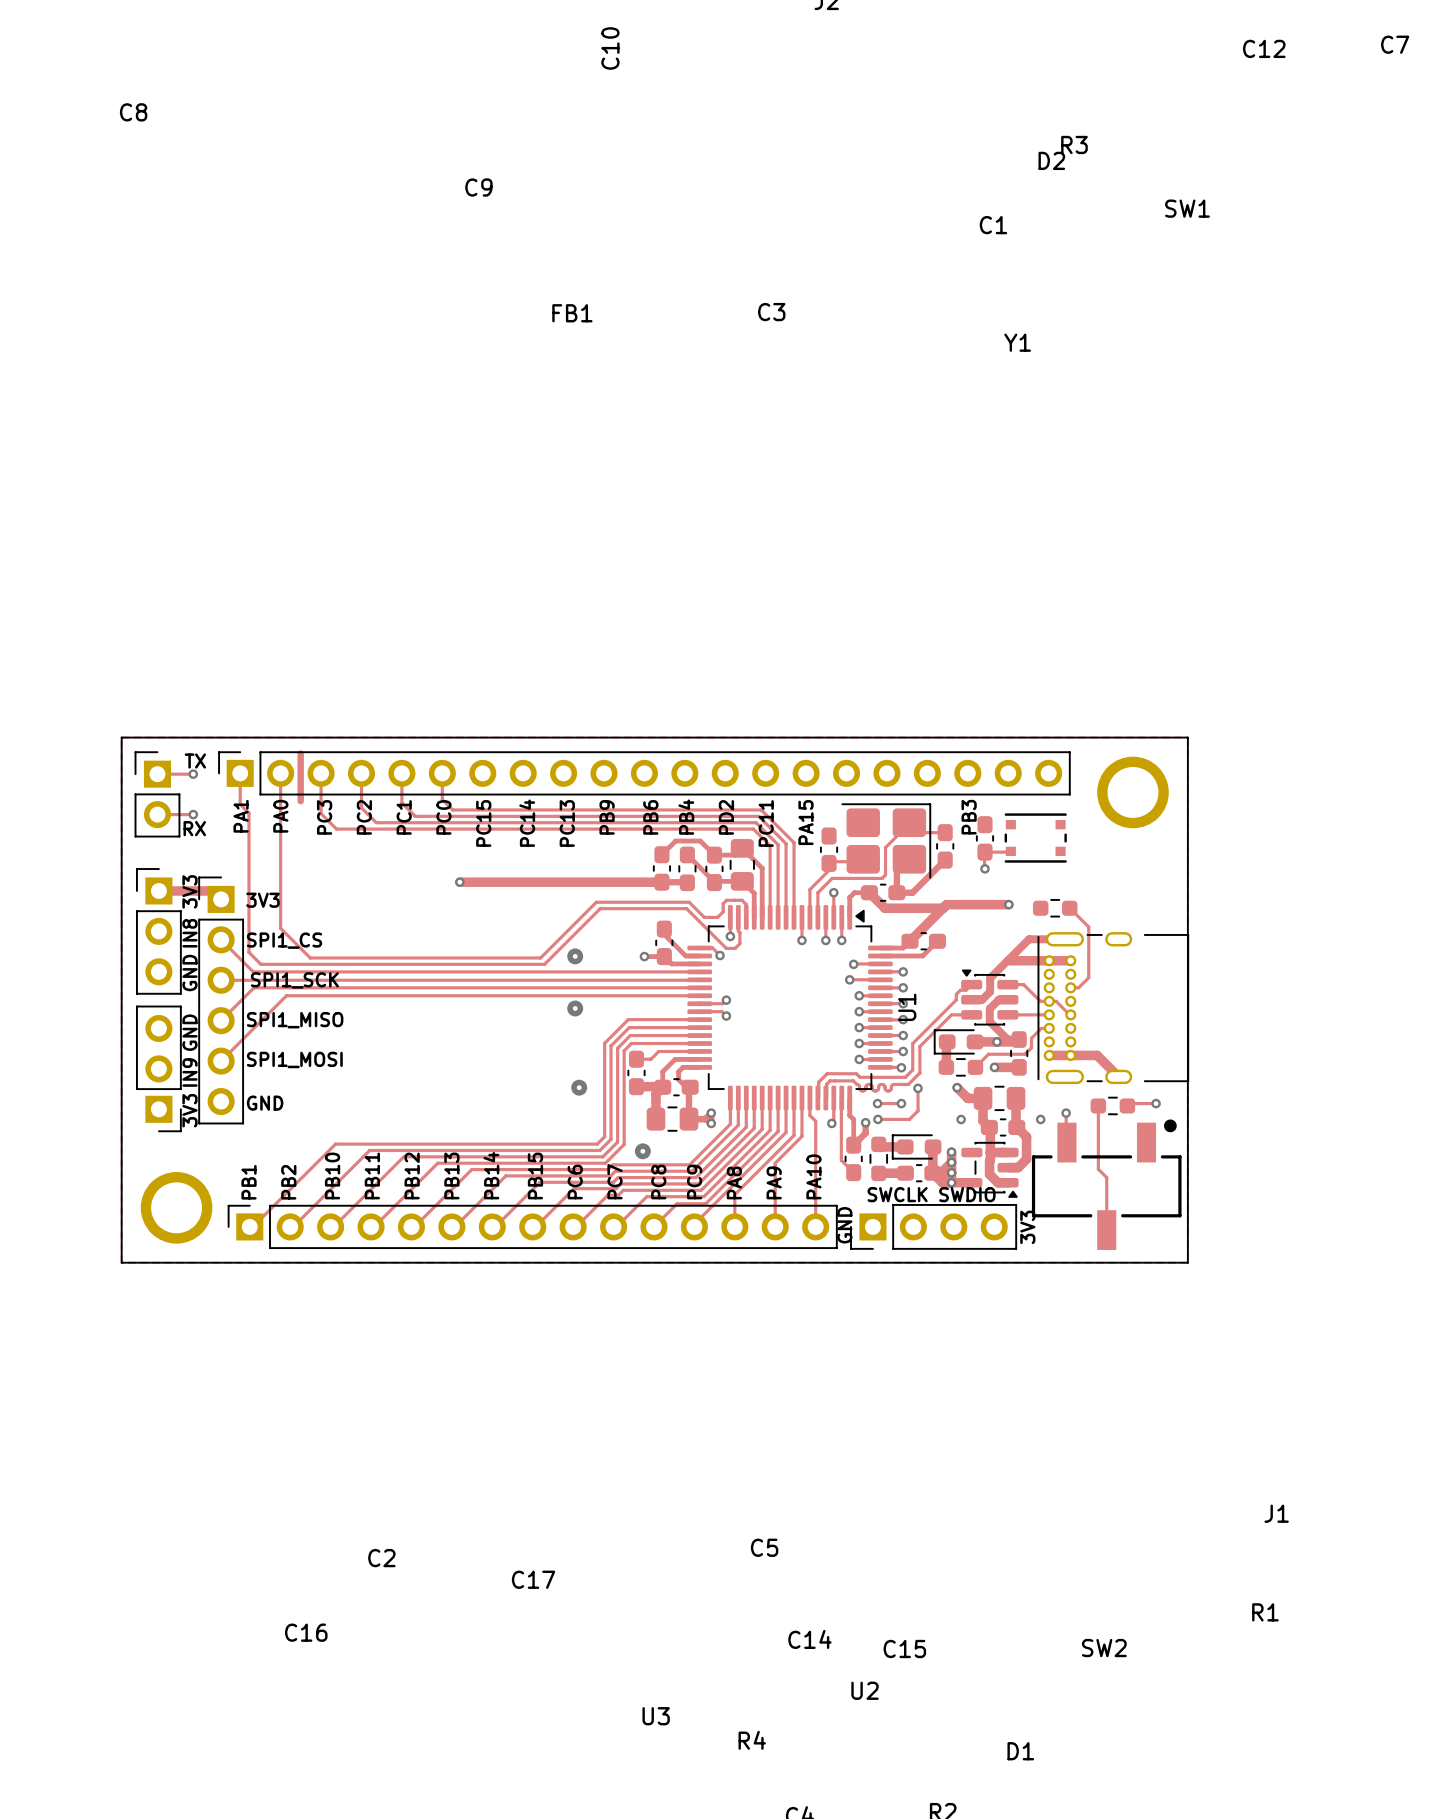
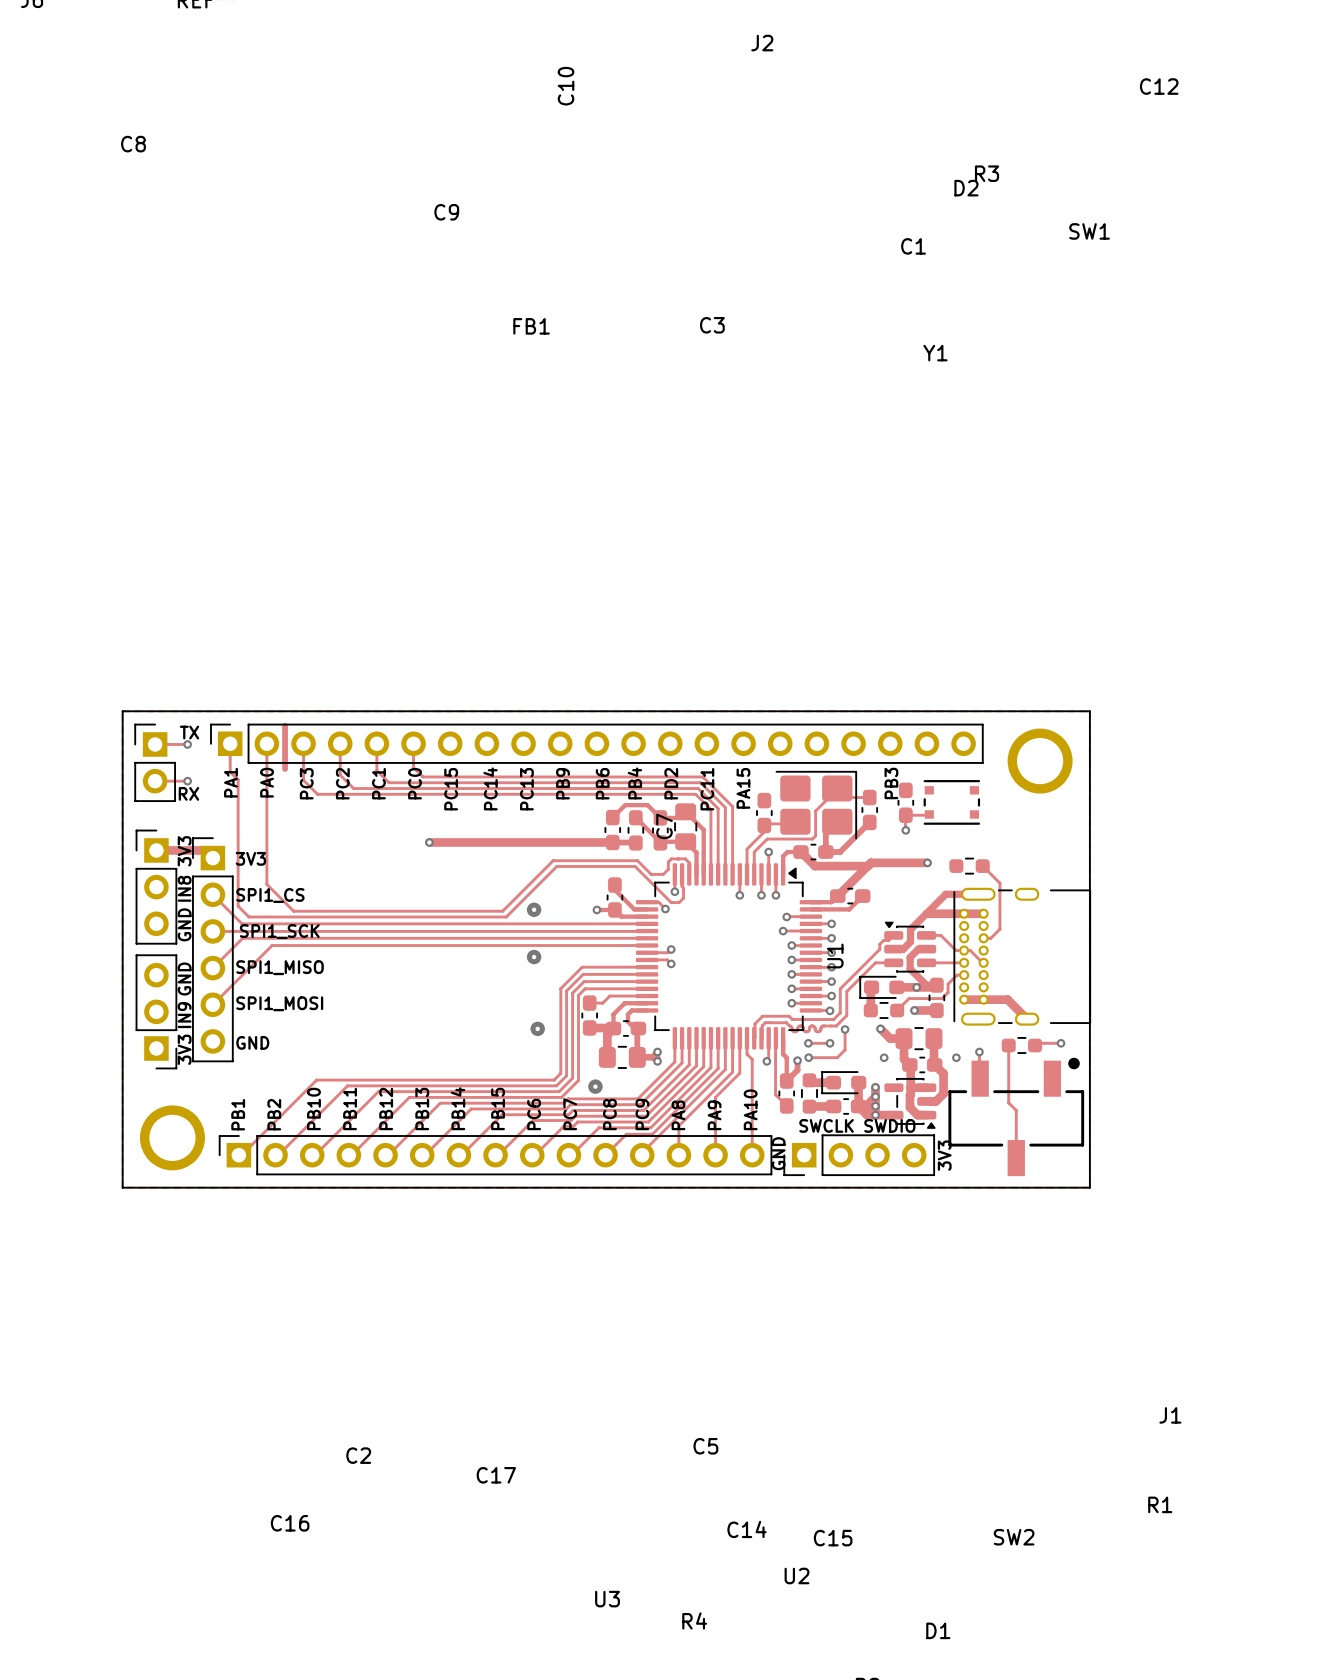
C7 name rotation: 0° (1395, 44) -> 90° counterclockwise (664, 826)
C7 name position: C7 (1395, 44) -> C7 (664, 826)

